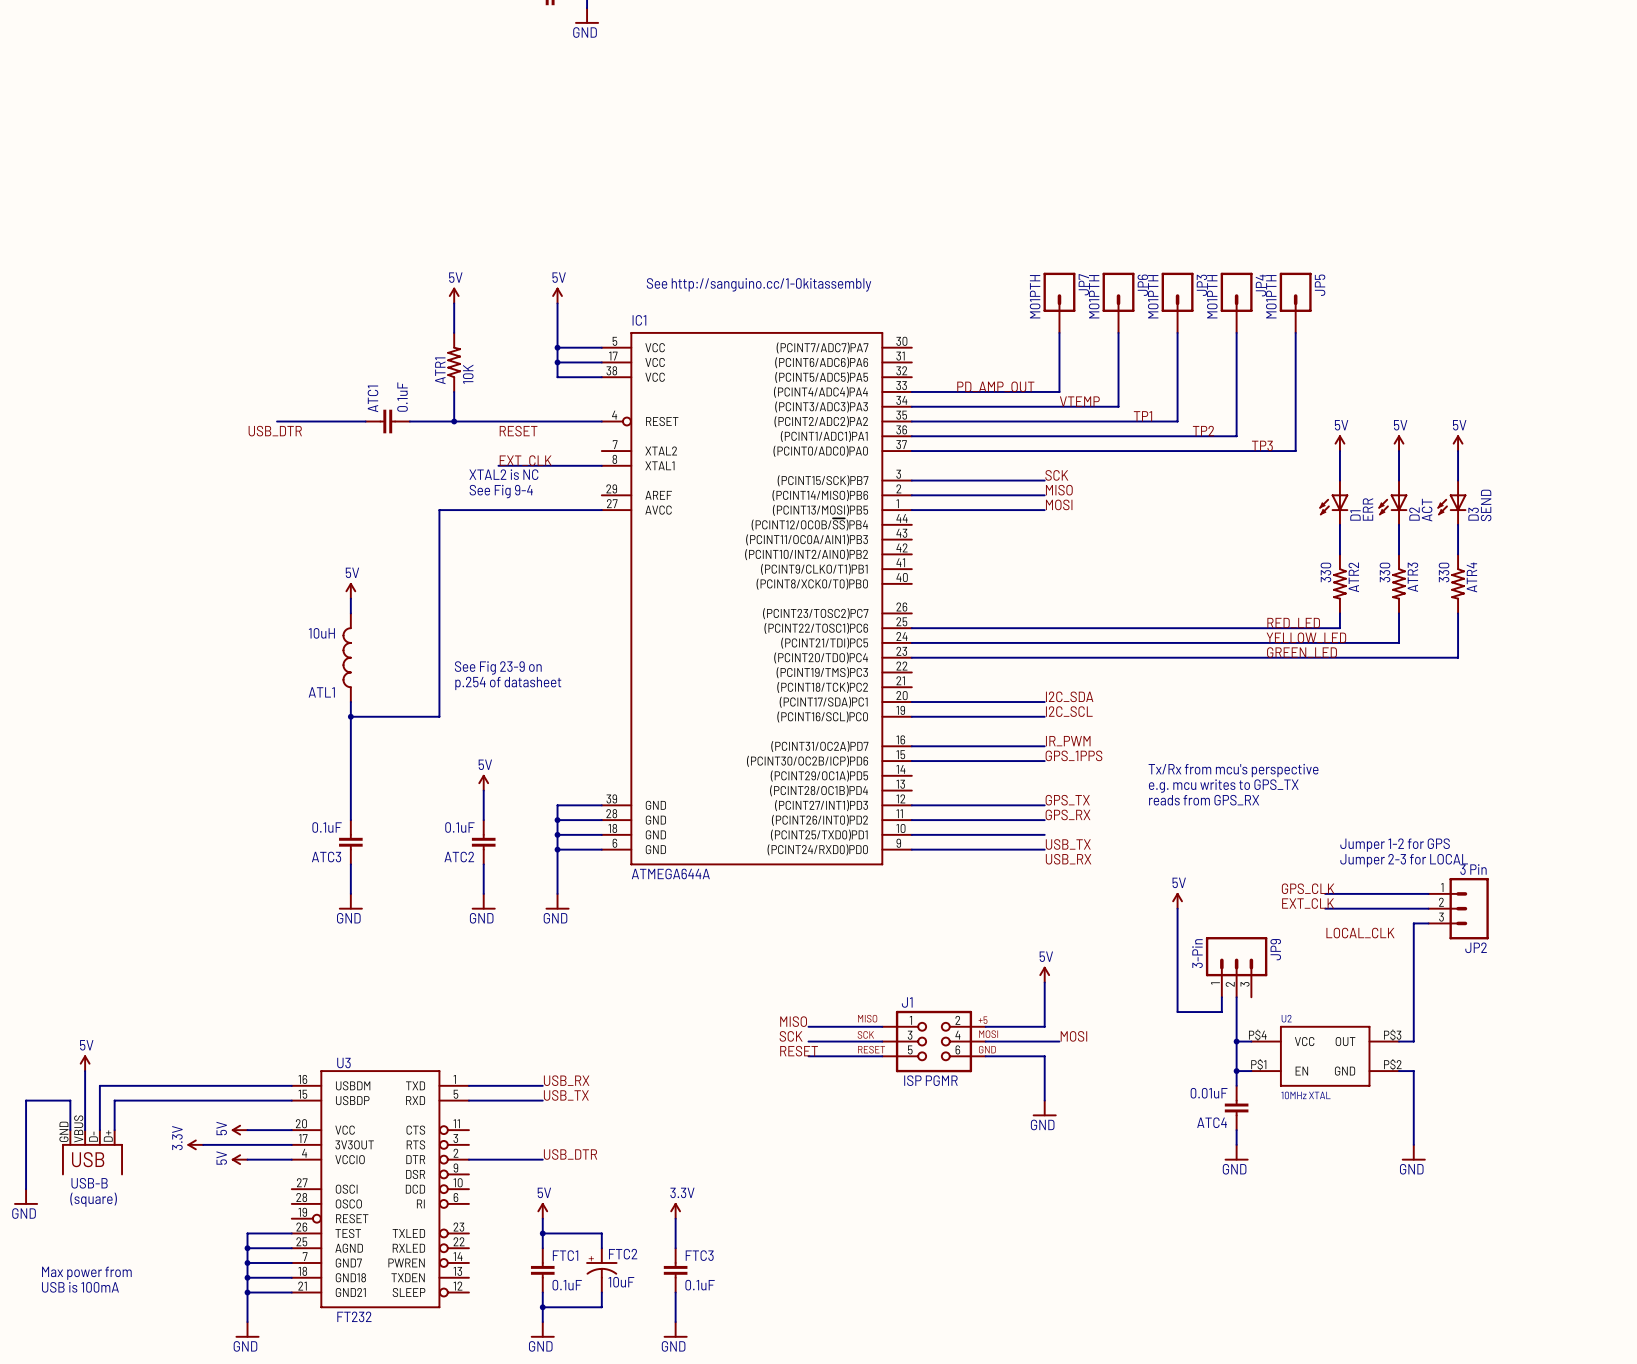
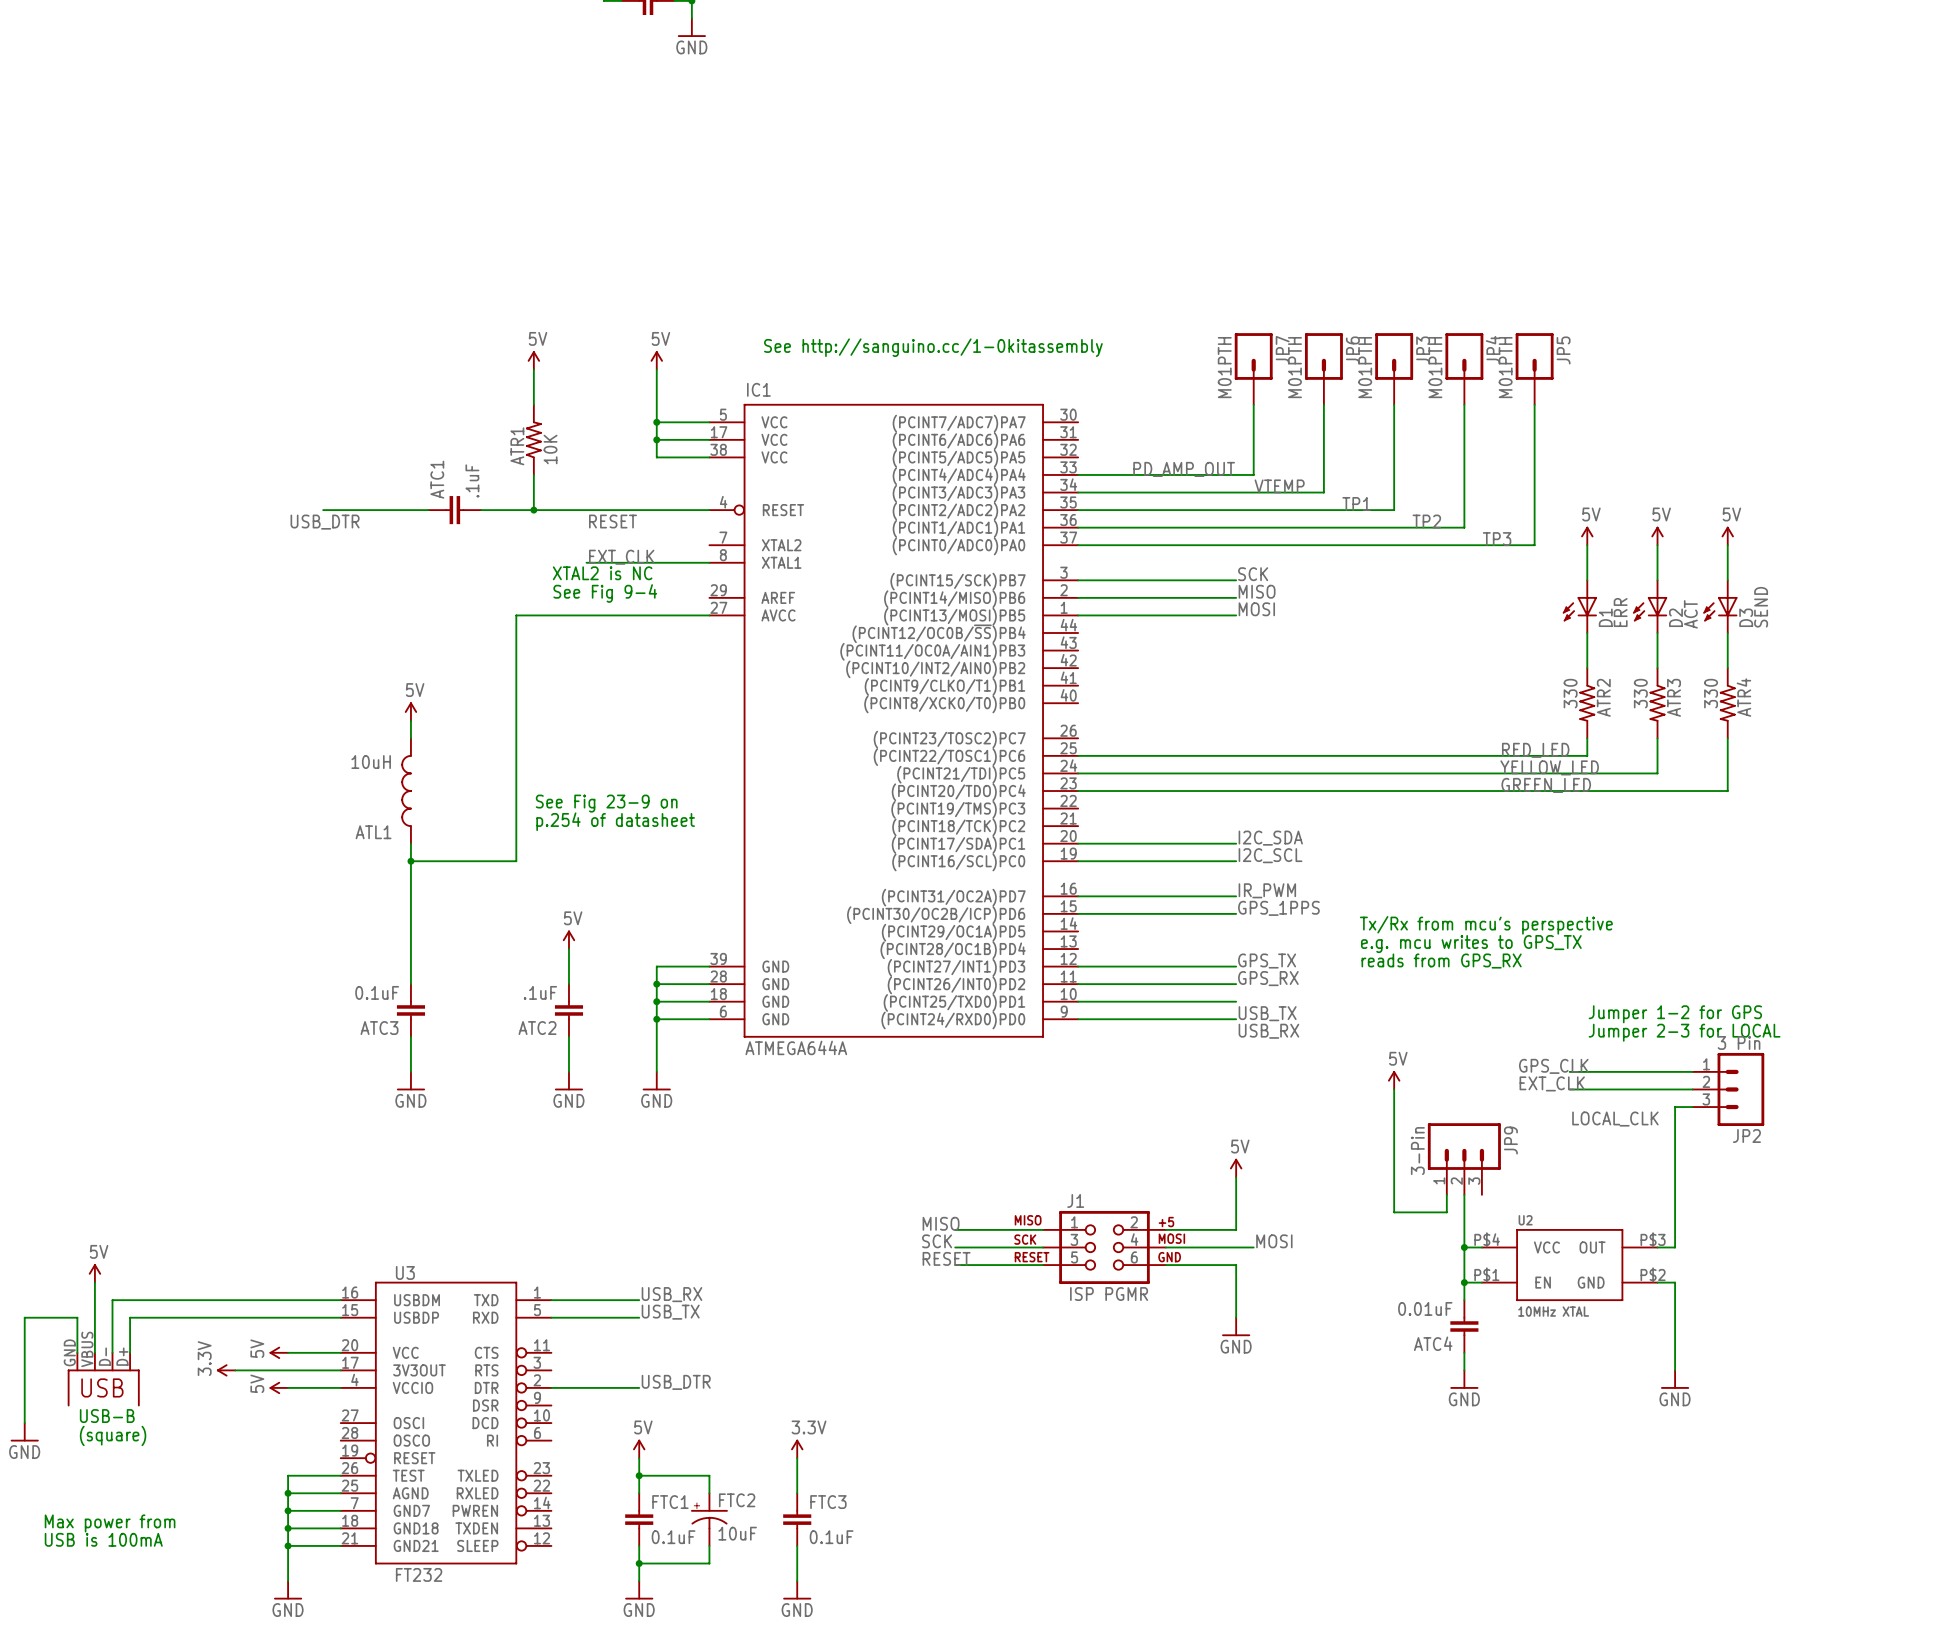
ATC1 value: 0.1uF (402, 397) -> .1uF (472, 481)
ATC2 value: 0.1uF (459, 827) -> .1uF (540, 992)

